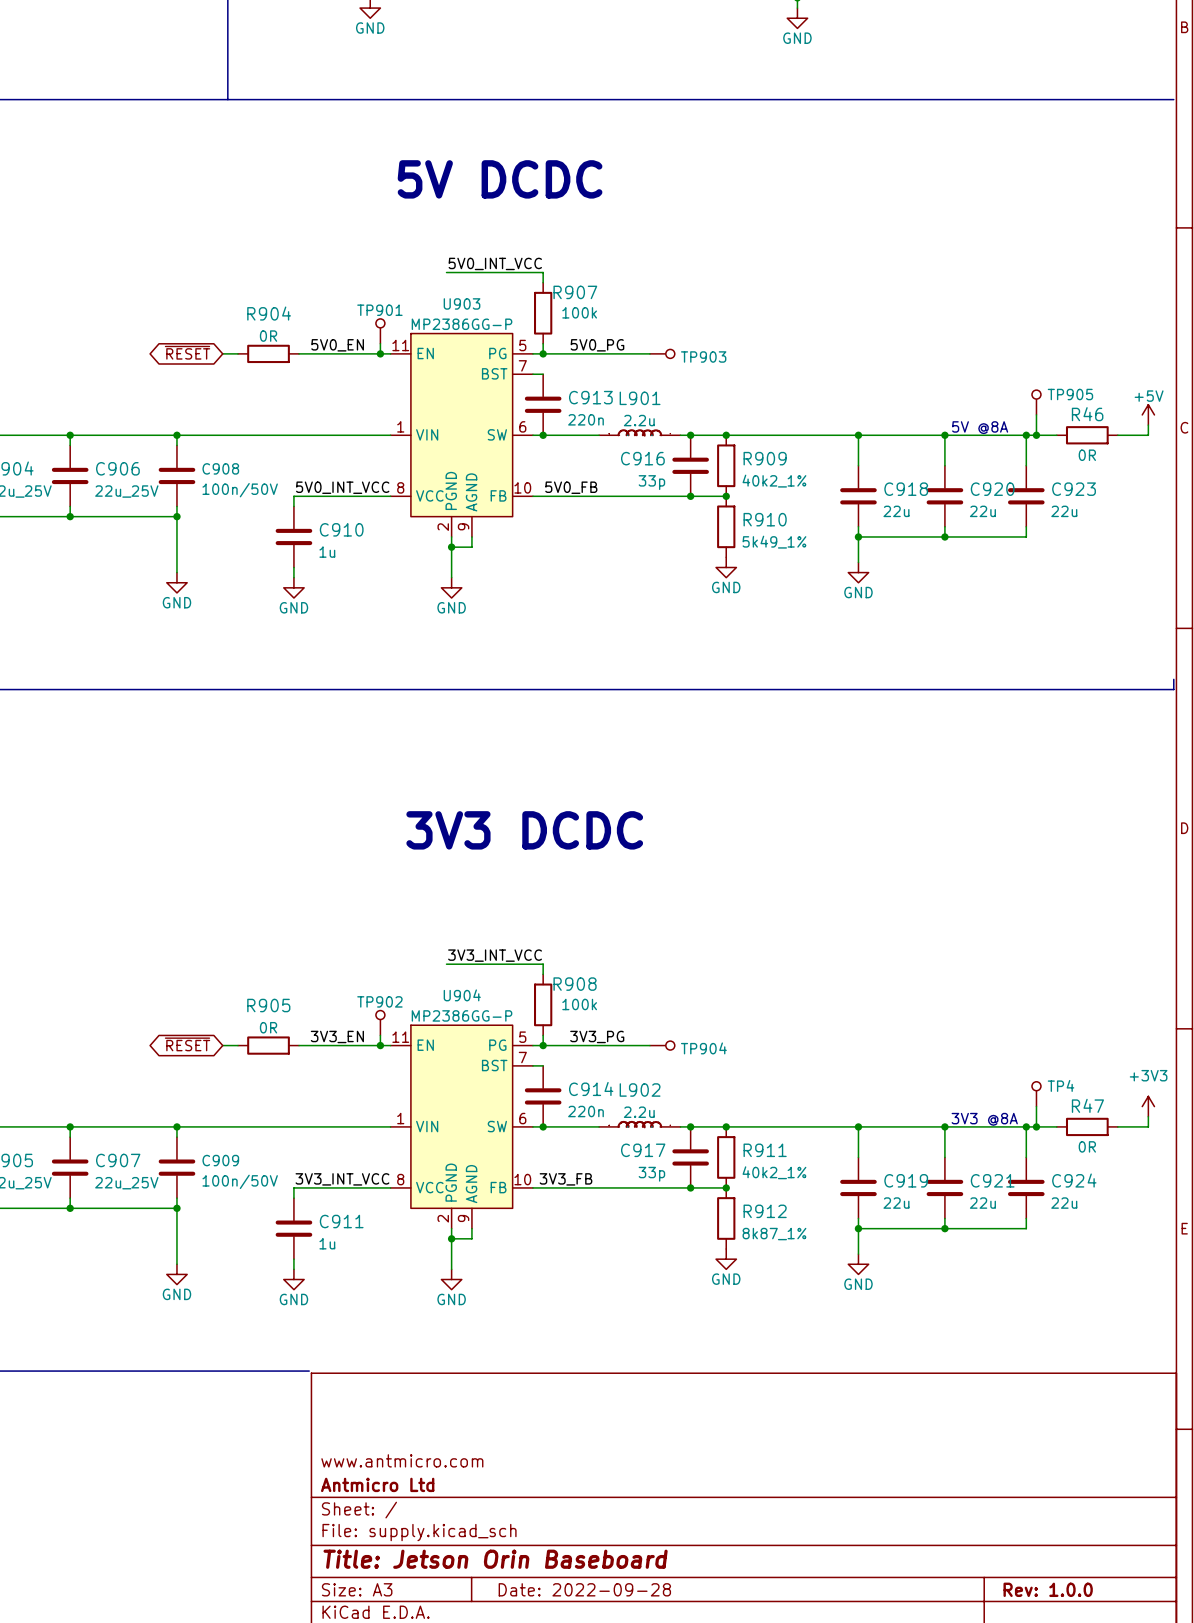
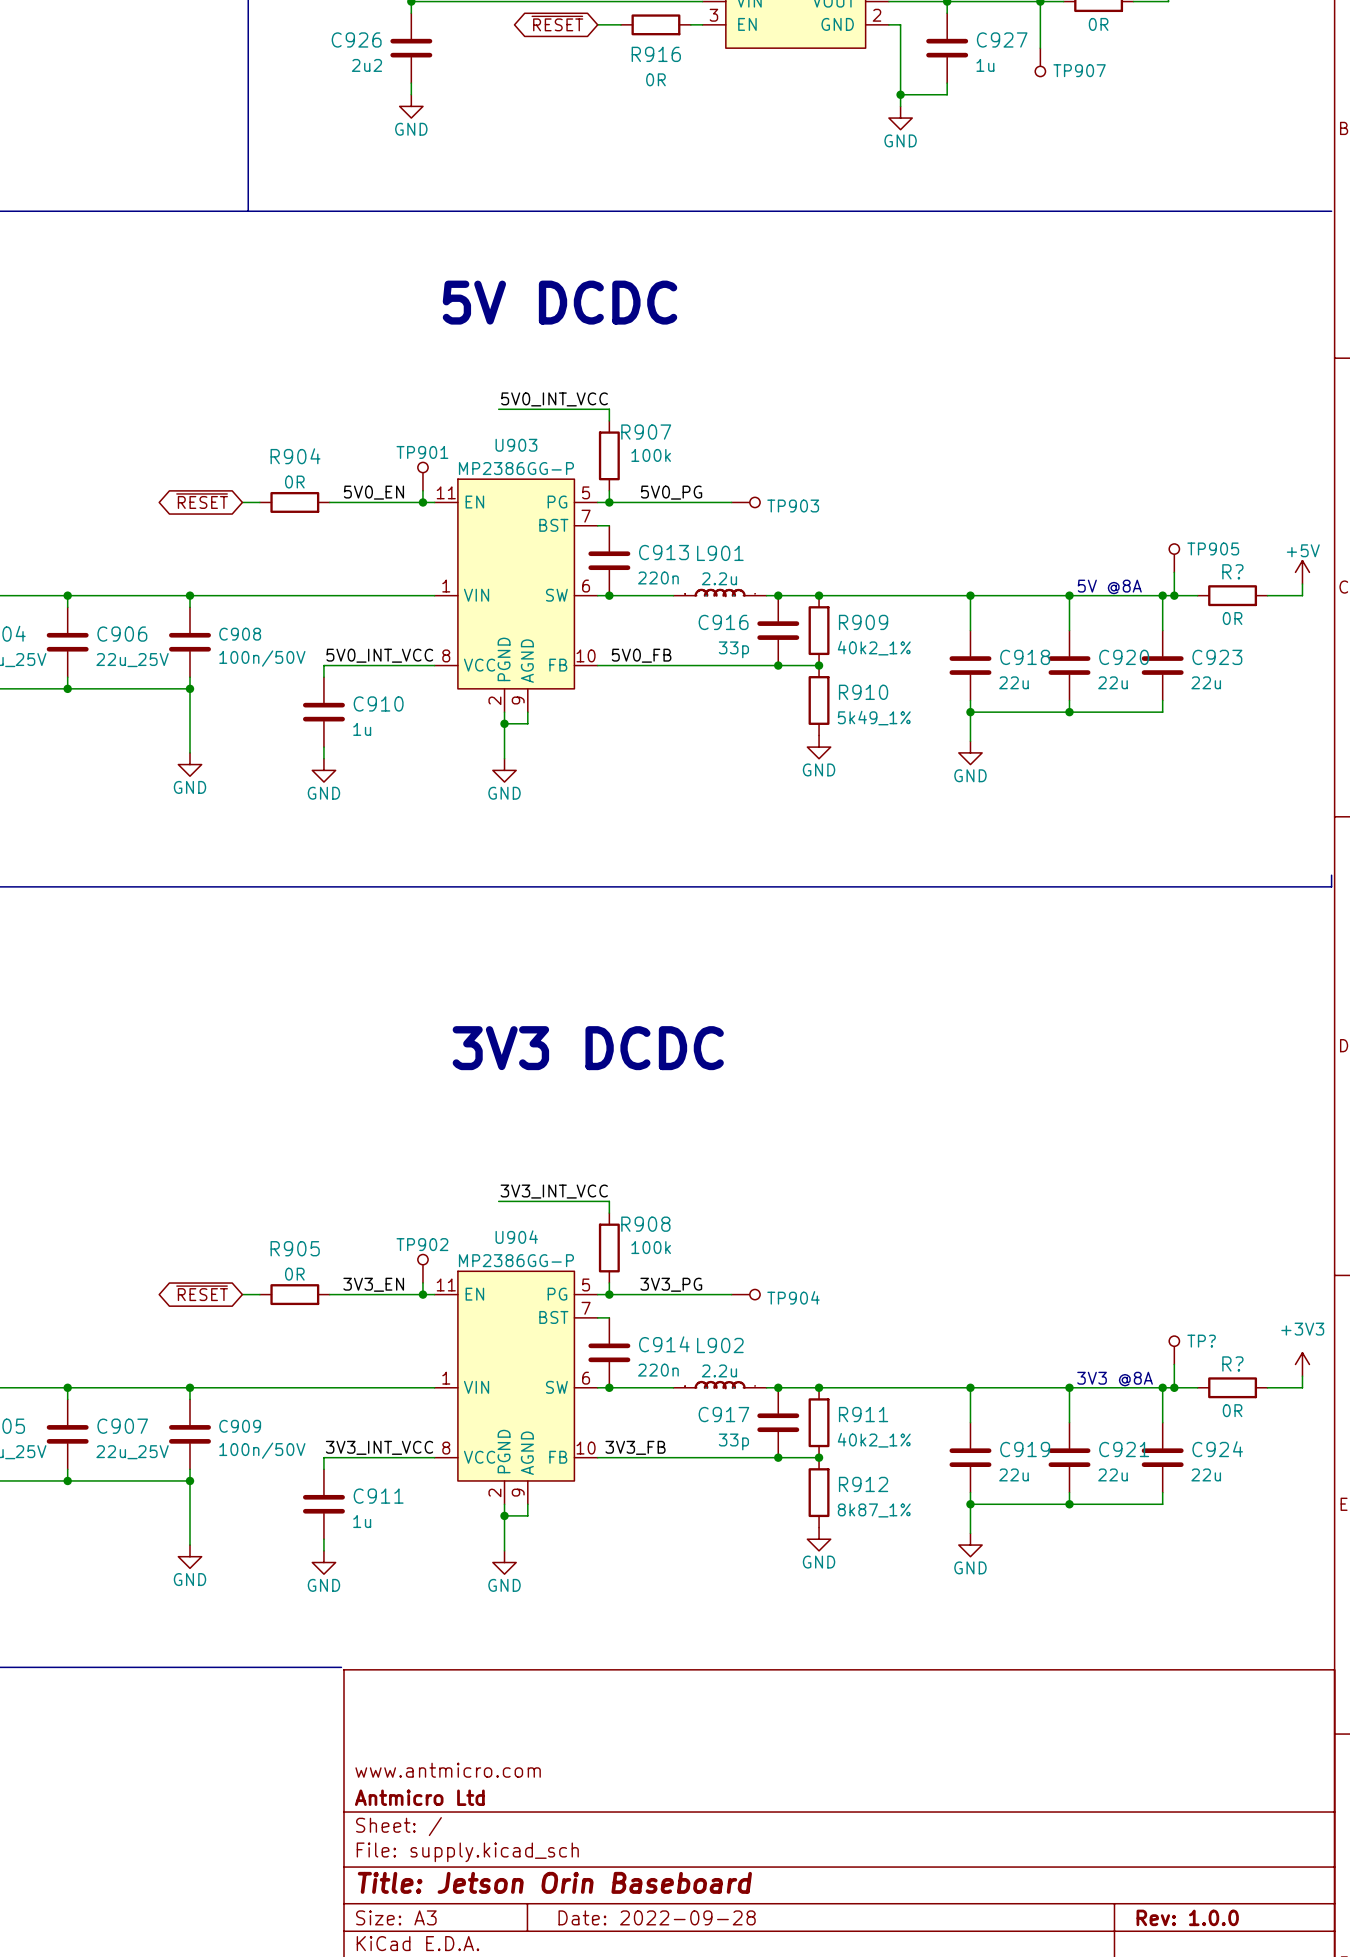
R46 name: R46 (1087, 414) -> R? (1232, 571)
TP4 name: TP4 (1061, 1085) -> TP? (1201, 1341)
R47 name: R47 (1087, 1105) -> R? (1232, 1363)

